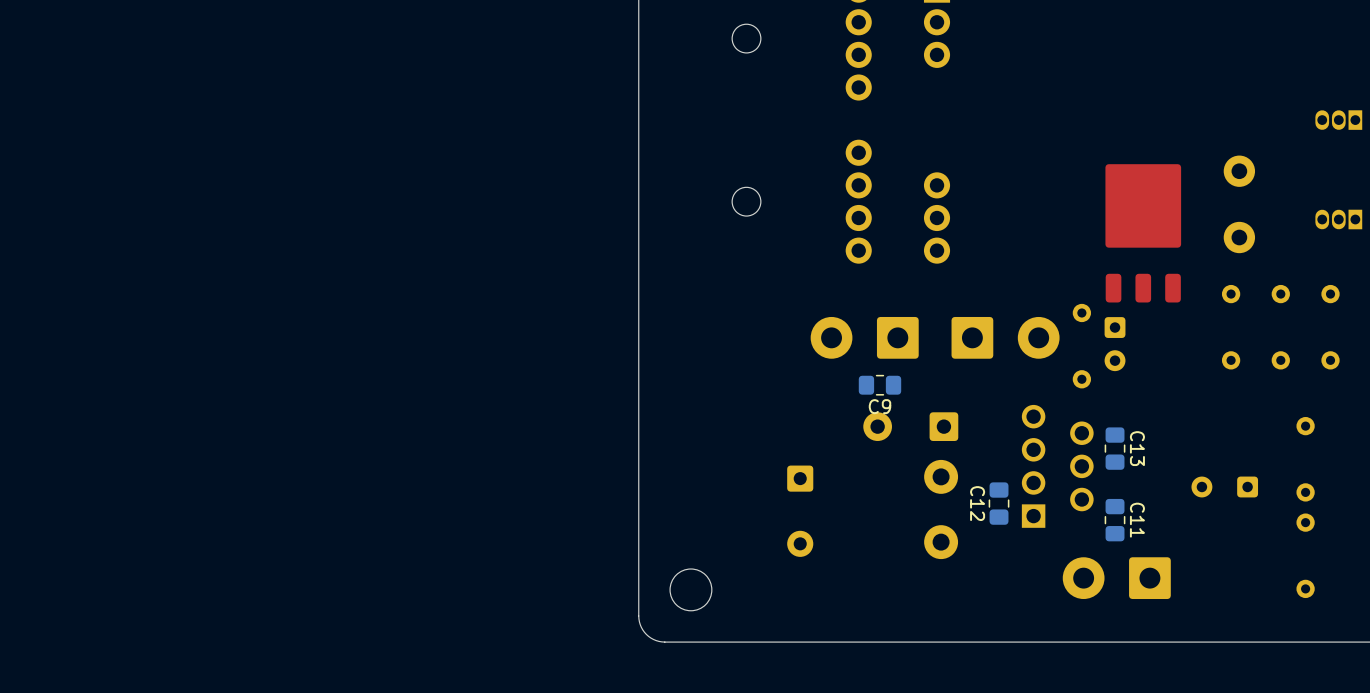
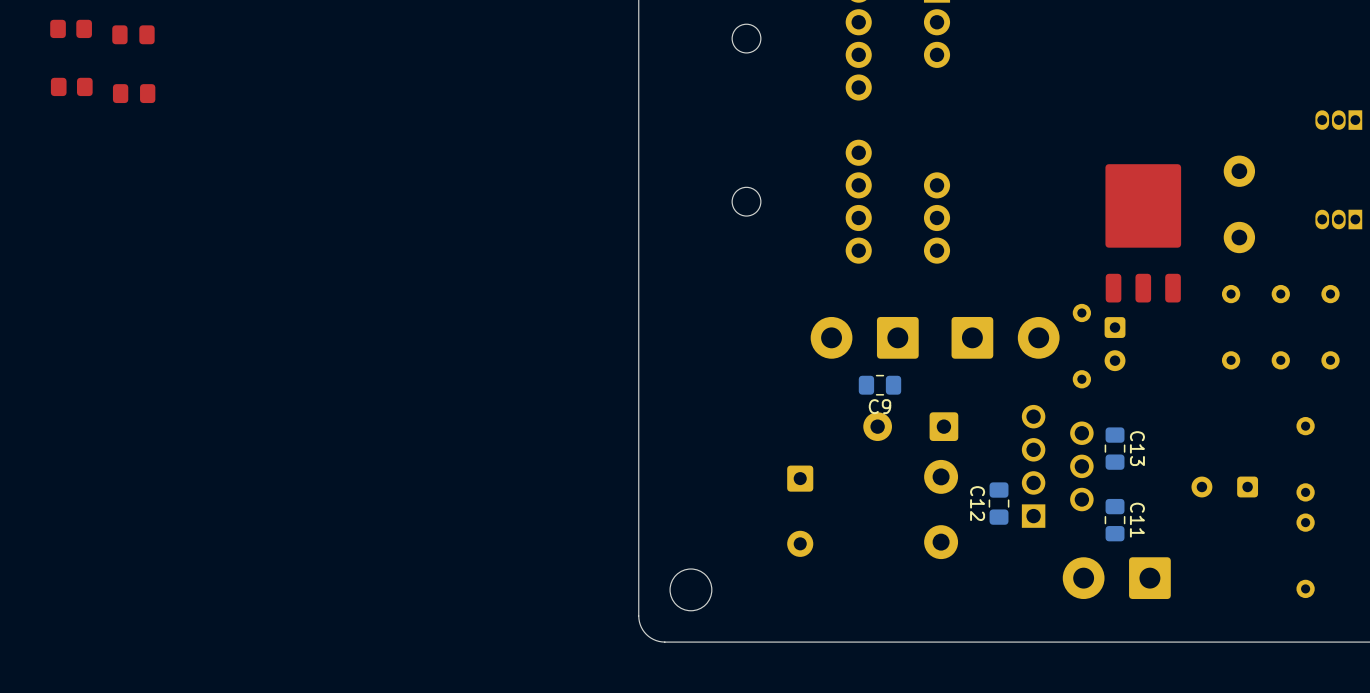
part: none -> (71, 28)
part: none -> (133, 34)
part: none -> (71, 86)
part: none -> (134, 93)

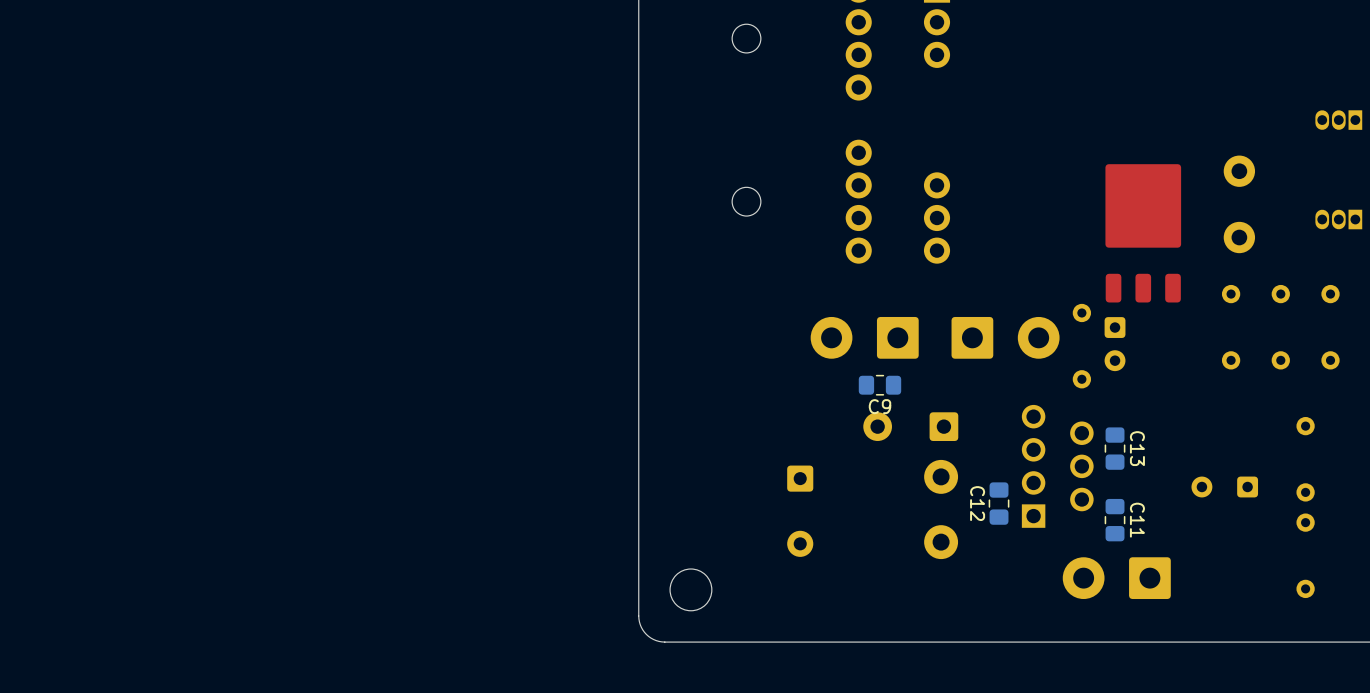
part: (71, 28) -> none
part: (133, 34) -> none
part: (71, 86) -> none
part: (134, 93) -> none

